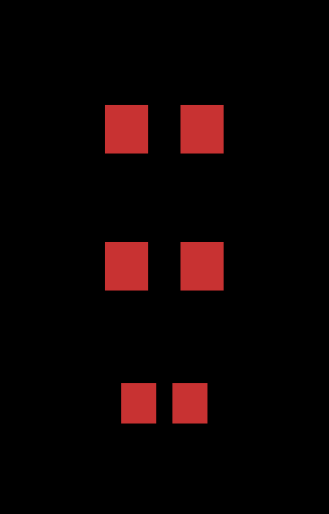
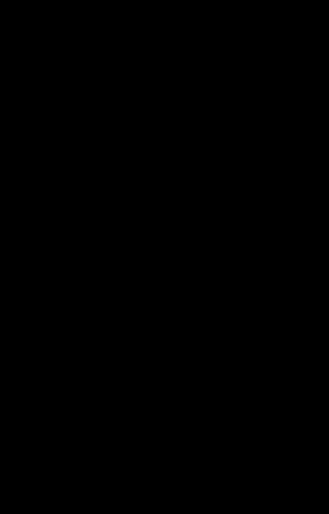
part: (164, 129) -> none
part: (164, 266) -> none
part: (164, 403) -> none

